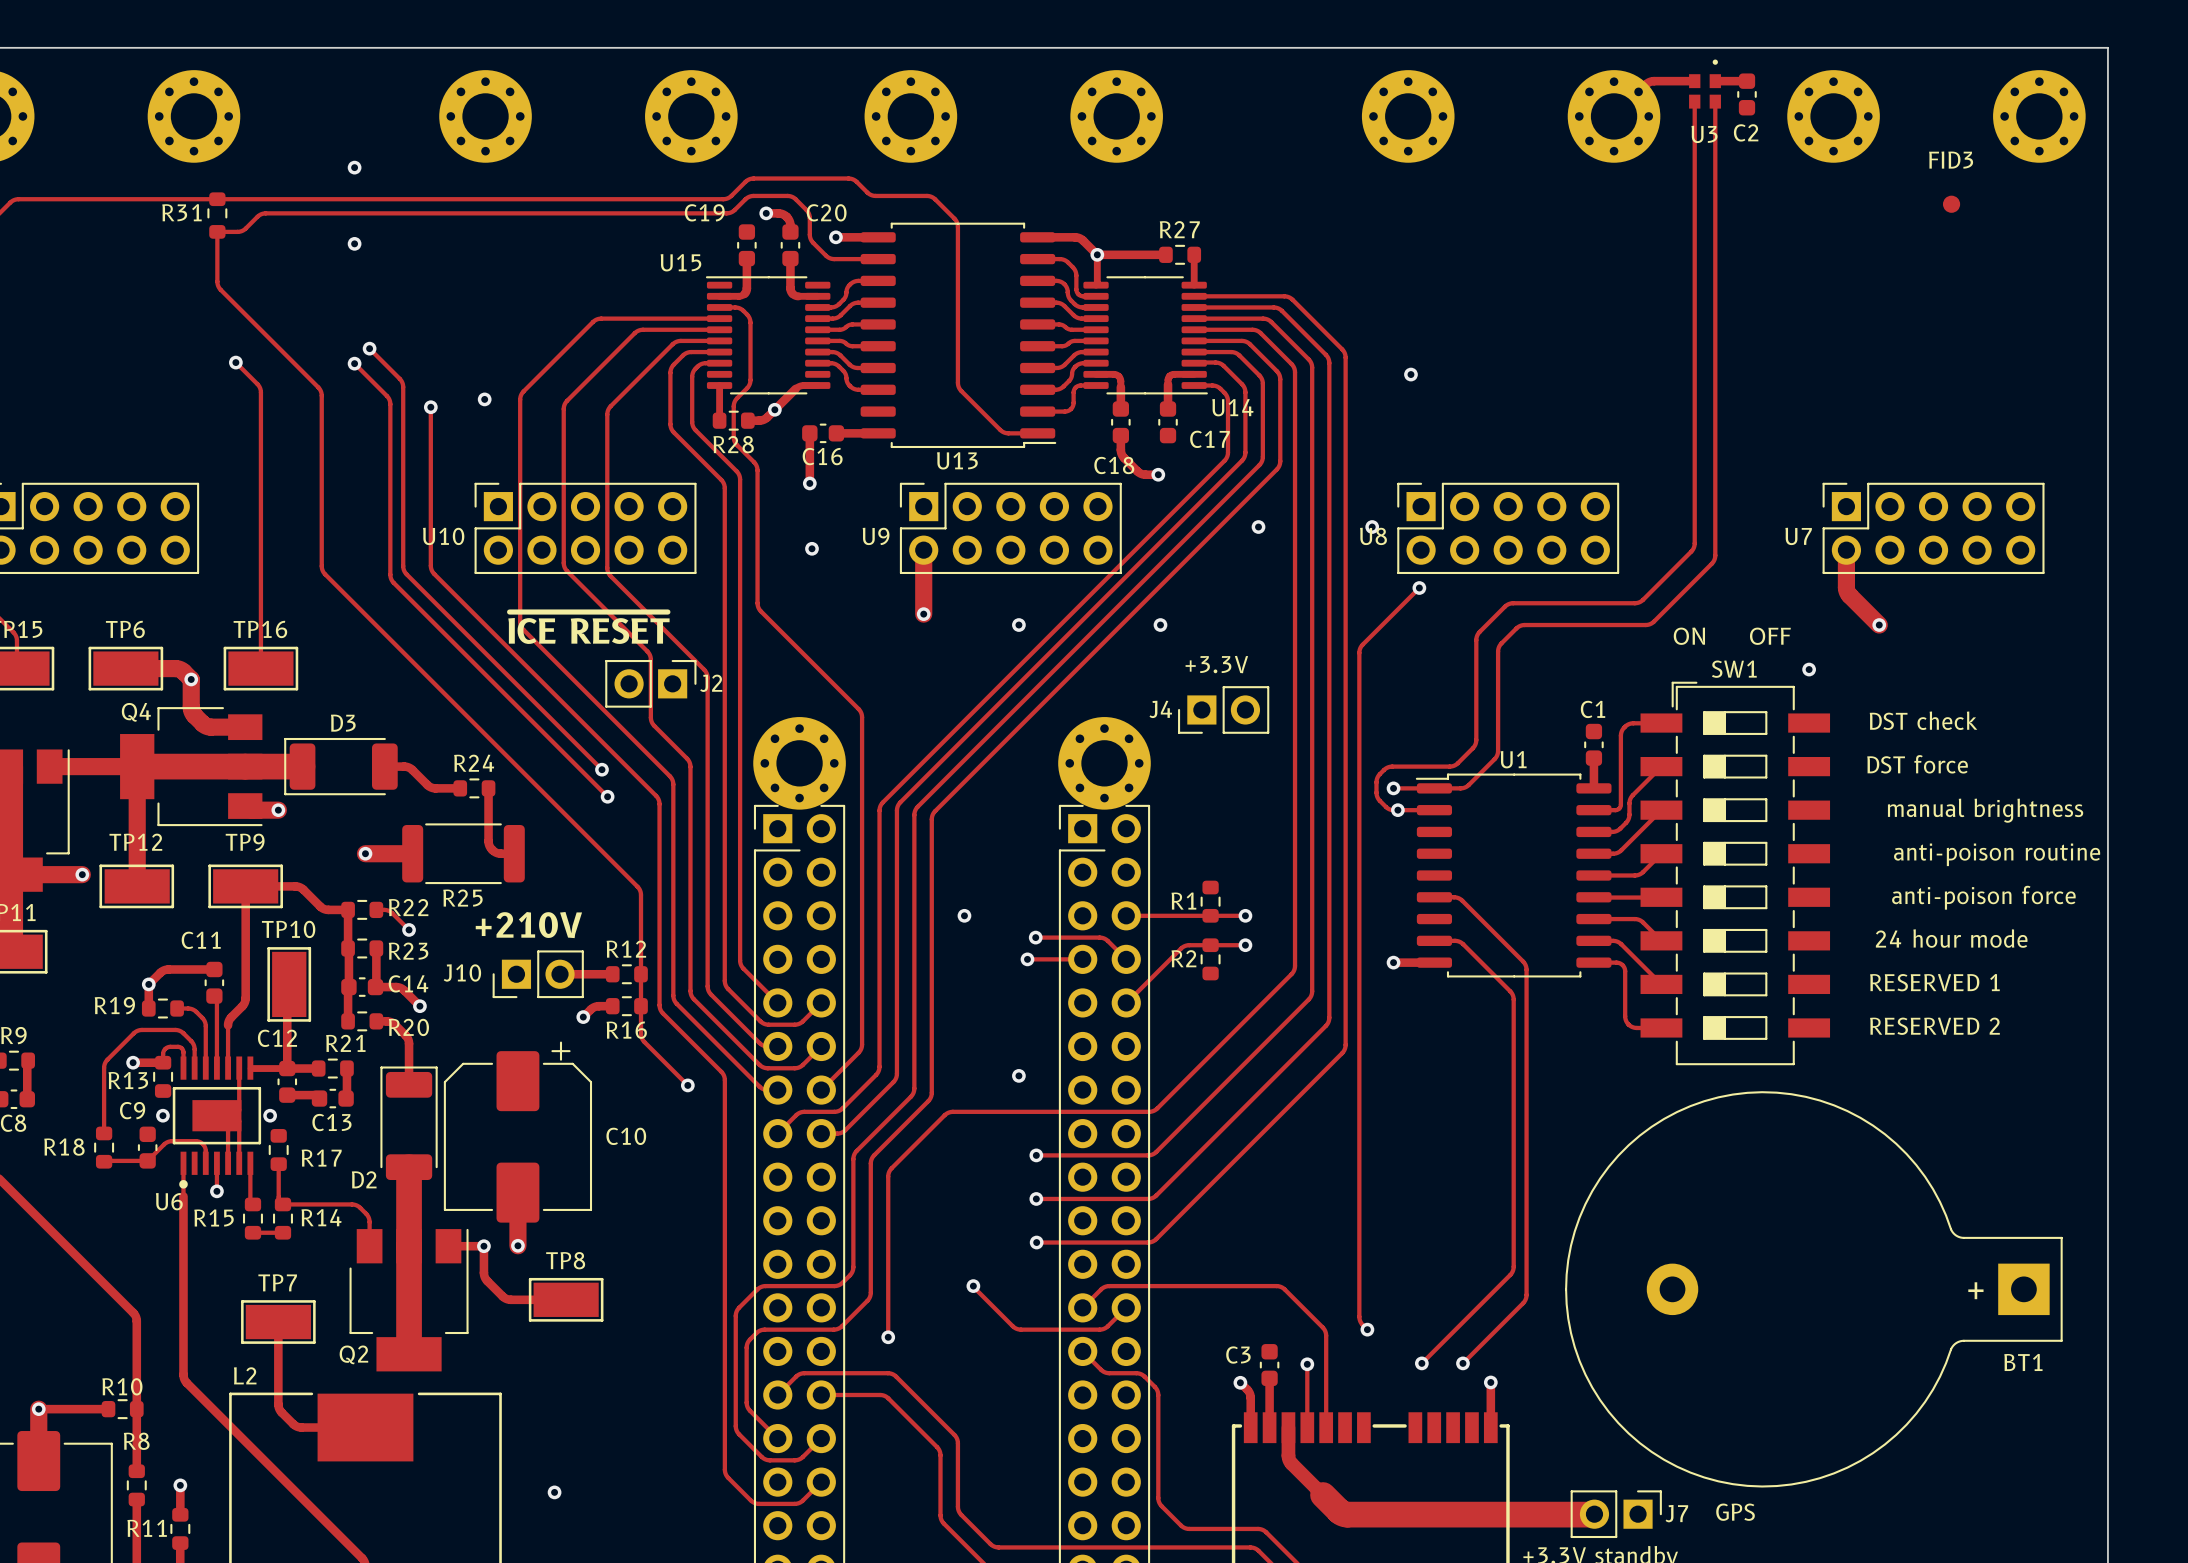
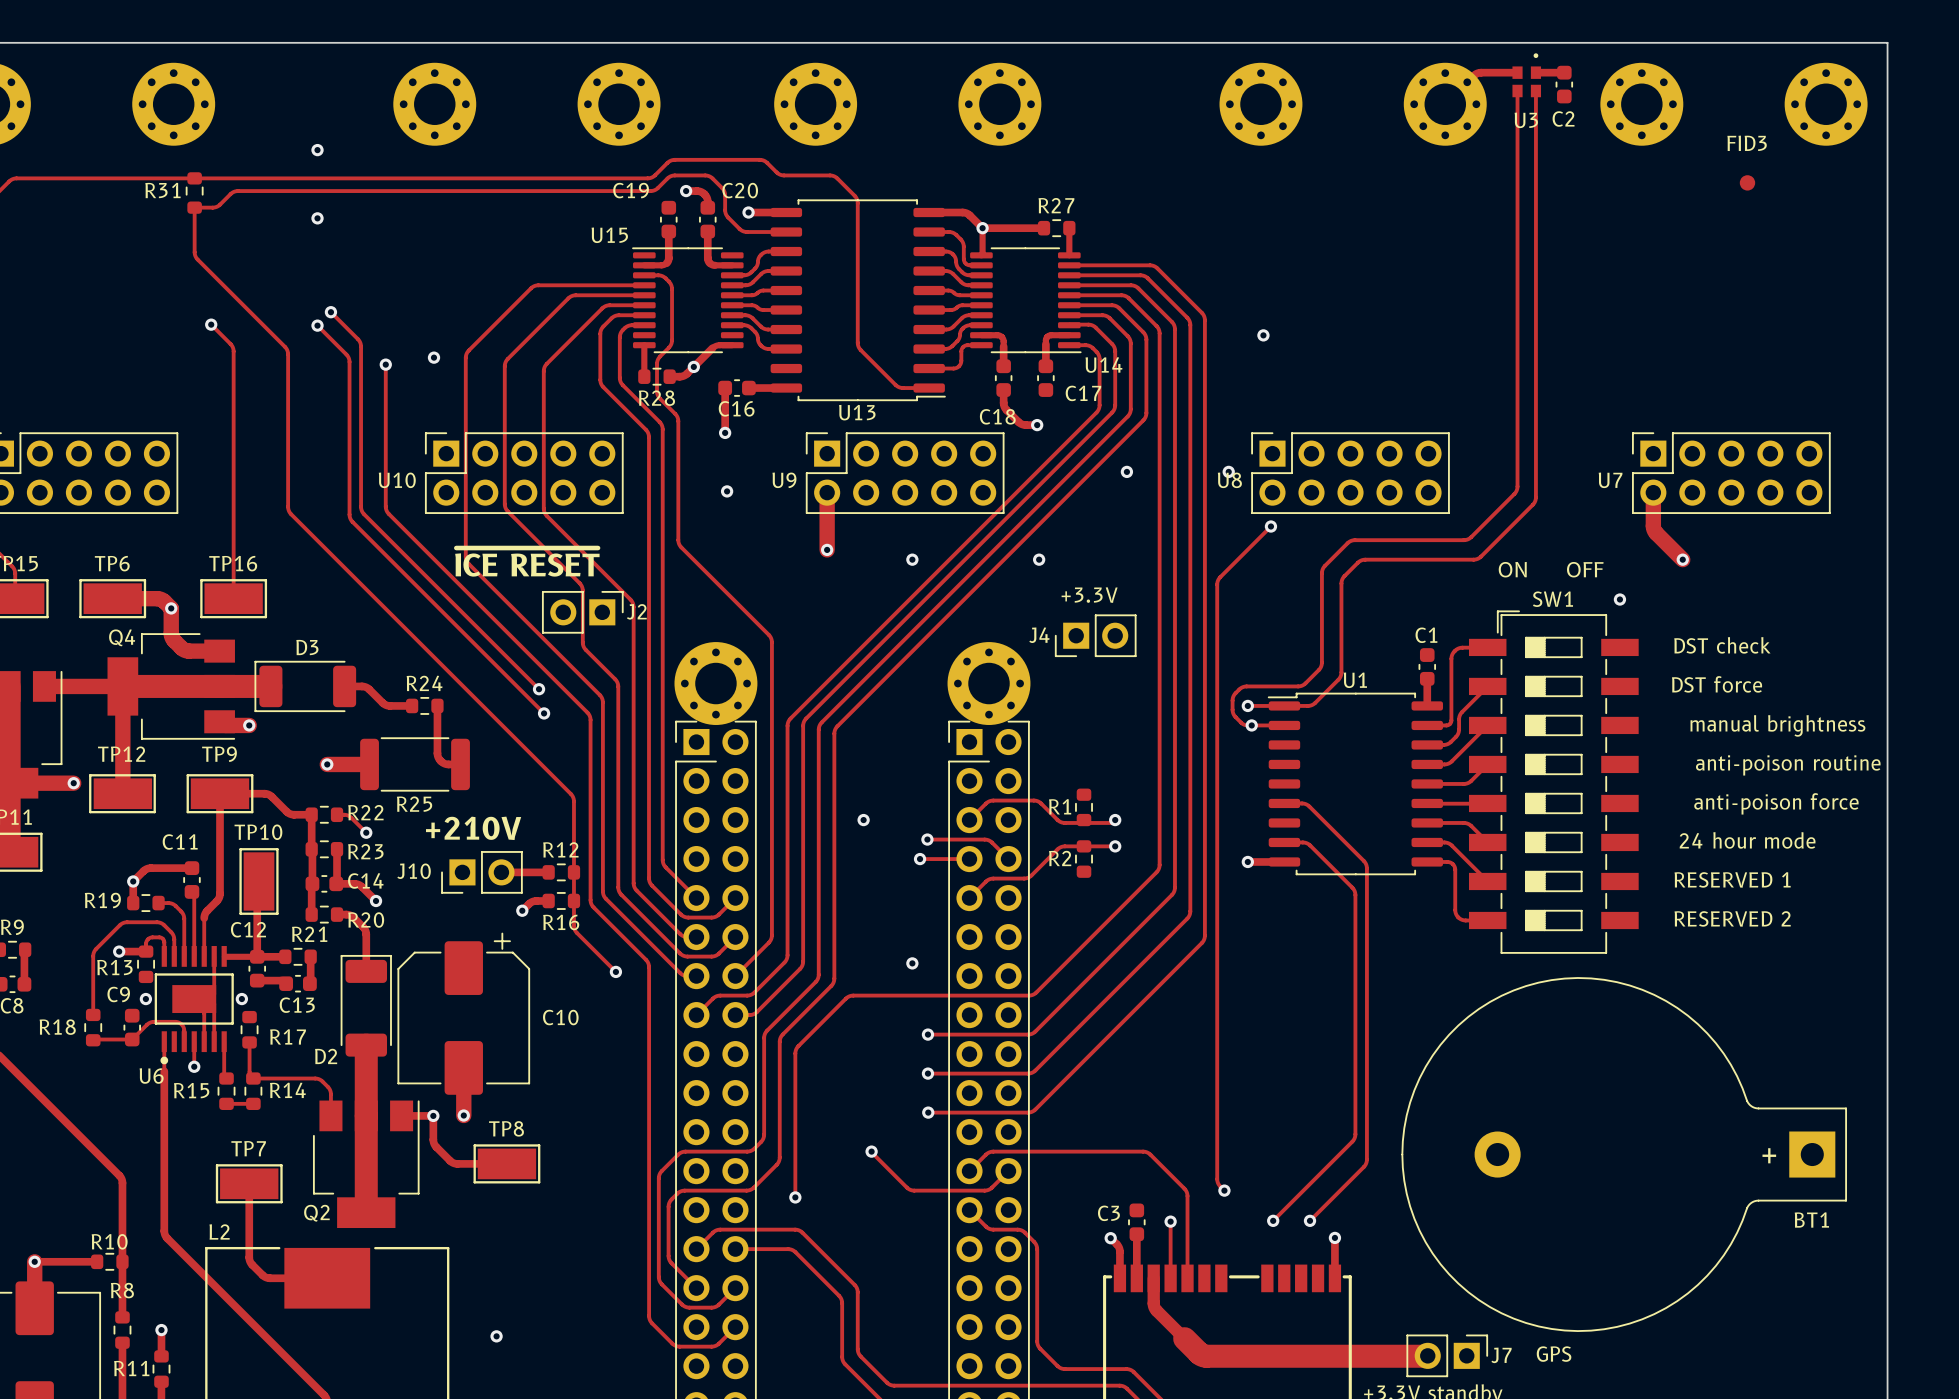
track: none -> (969, 820) (990, 801) (1033, 800) (1040, 802) (1062, 822) (1115, 822)
track: (1126, 915) (1245, 915) -> none
track: (1151, 977) (1126, 1002) -> (1031, 875) (1025, 878) (989, 879) (969, 898)

